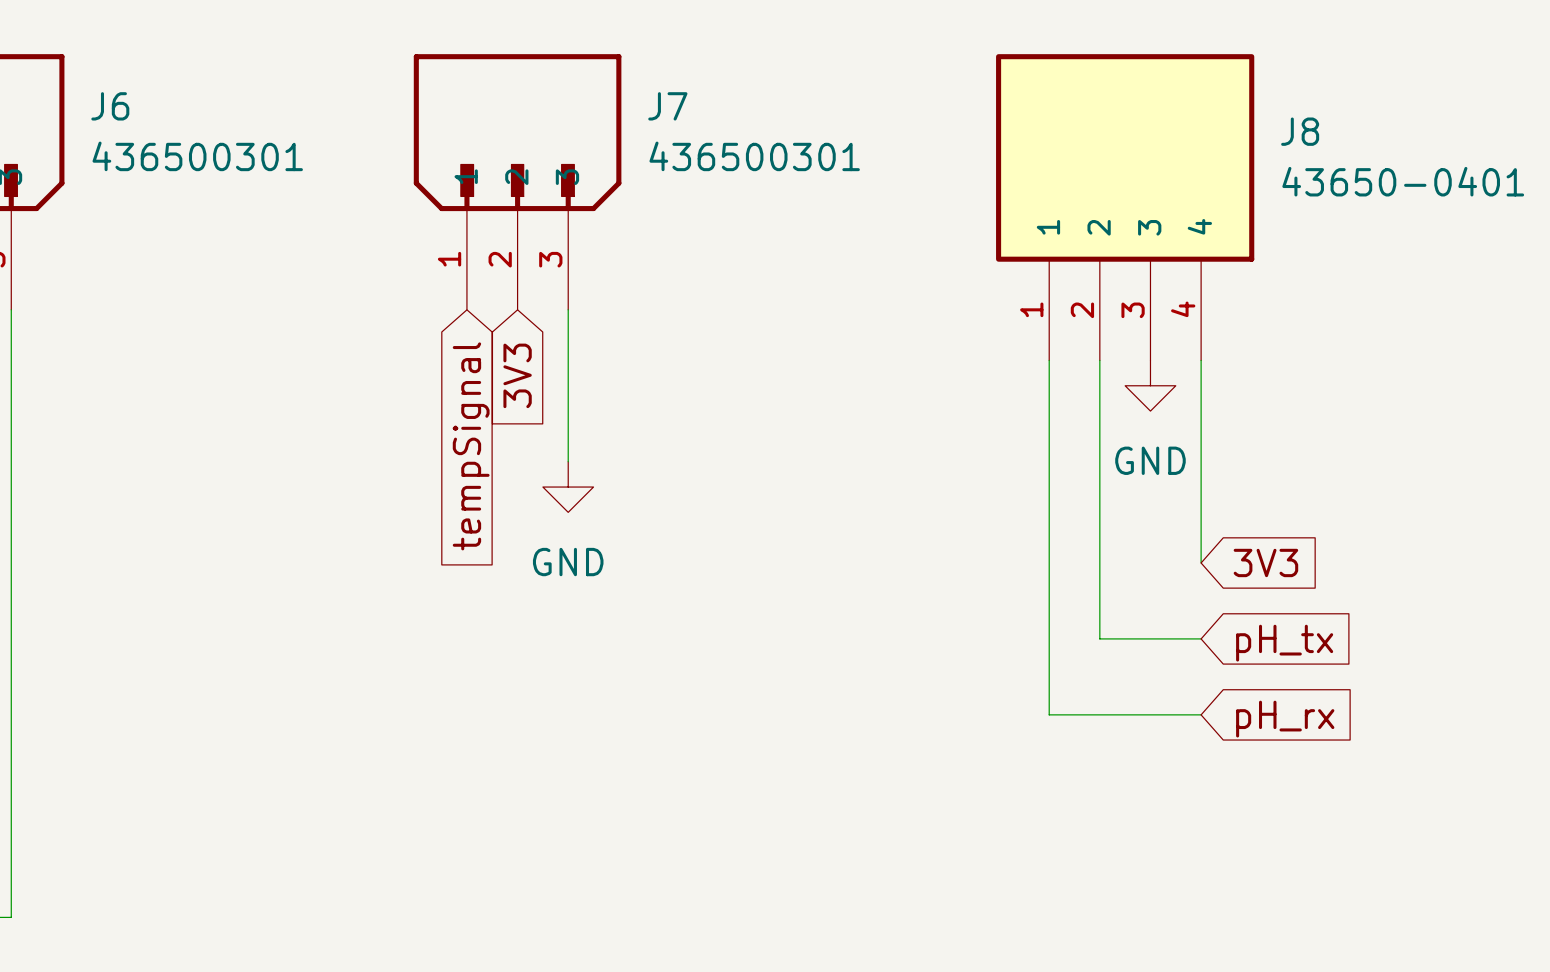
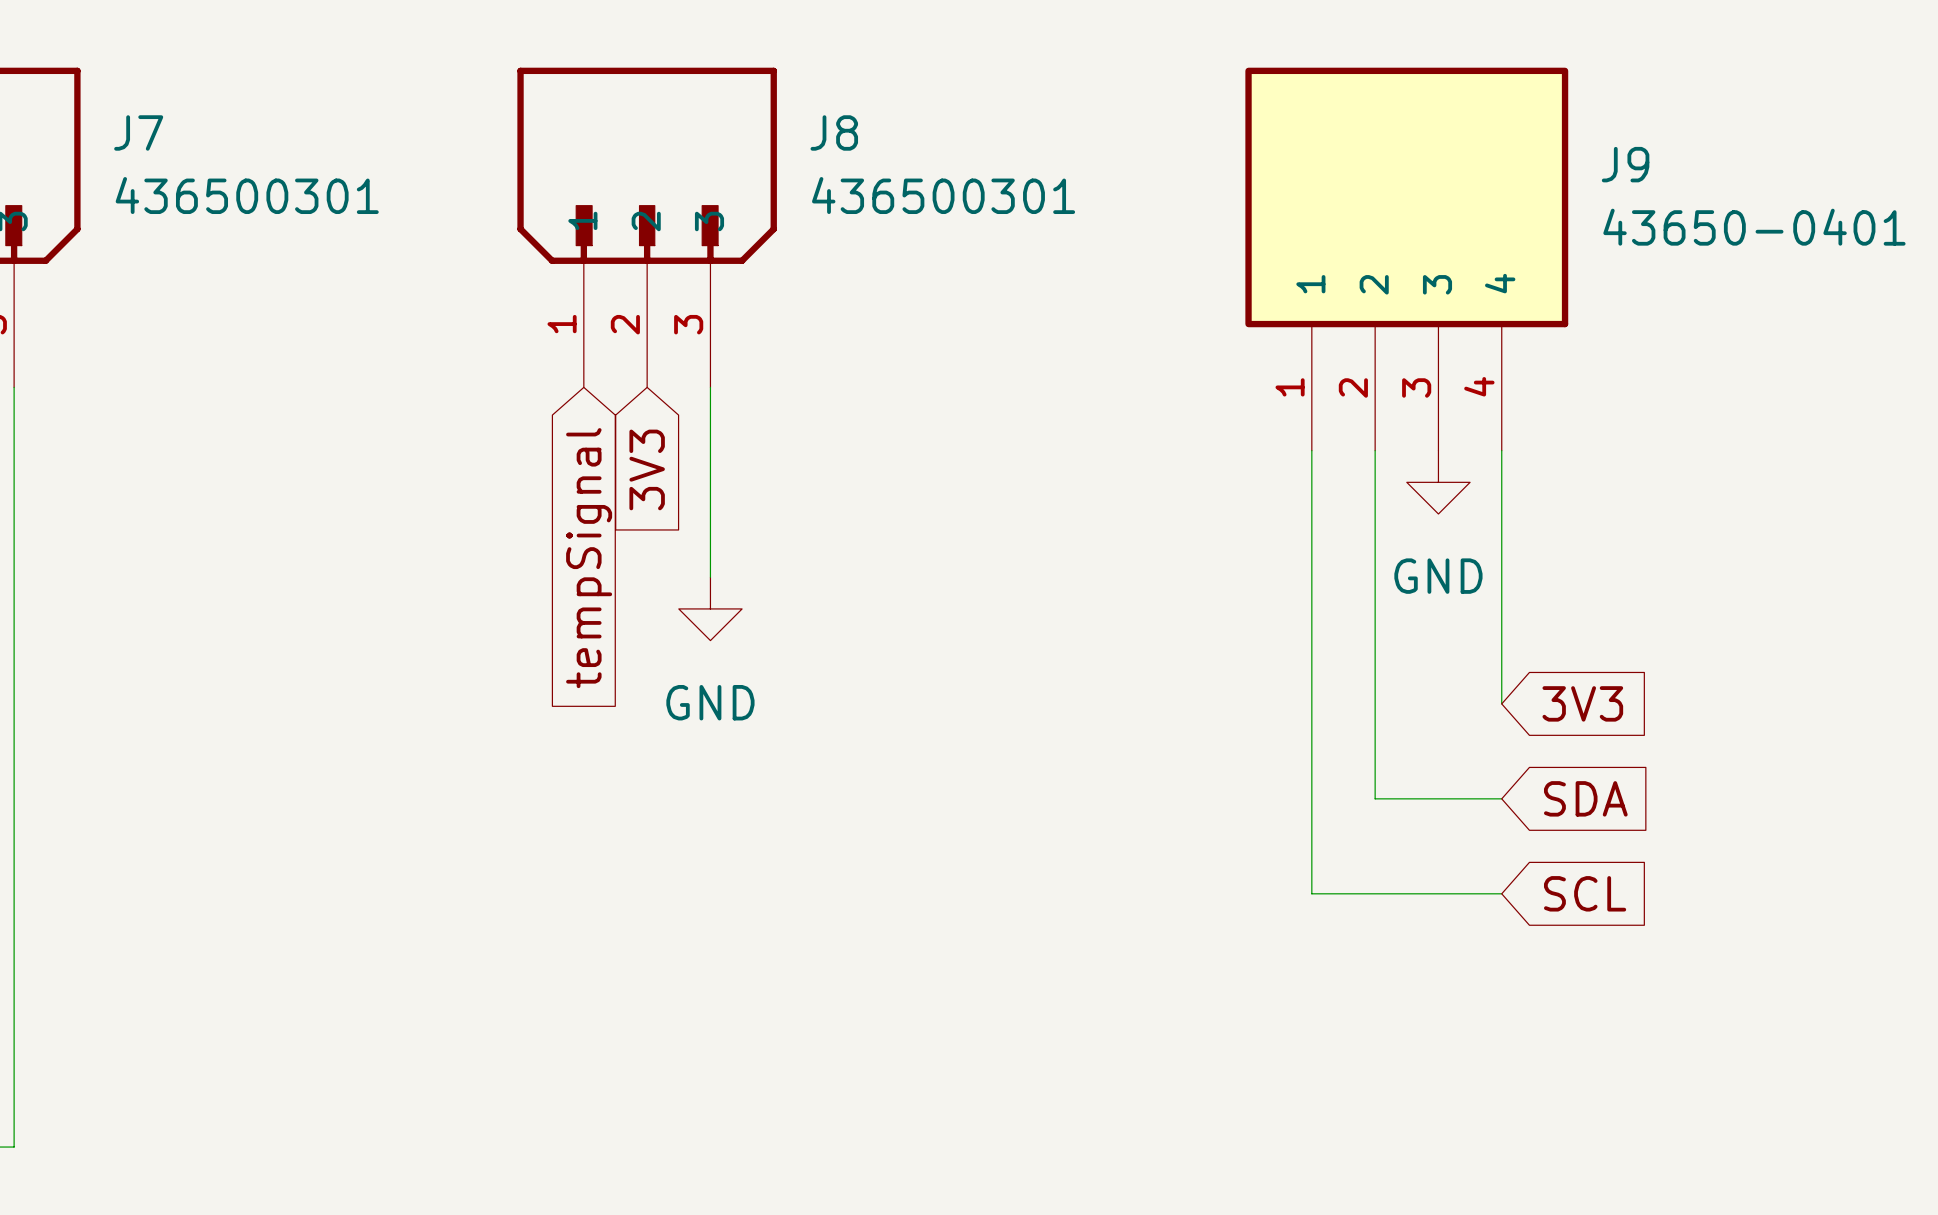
J6 name: J6 (110, 106) -> J7 (138, 132)
J7 name: J7 (667, 106) -> J8 (834, 132)
J8 name: J8 (1300, 131) -> J9 (1625, 164)
global label: pH_tx (1284, 643) -> SDA (1585, 798)
global label: pH_rx (1285, 719) -> SCL (1585, 893)

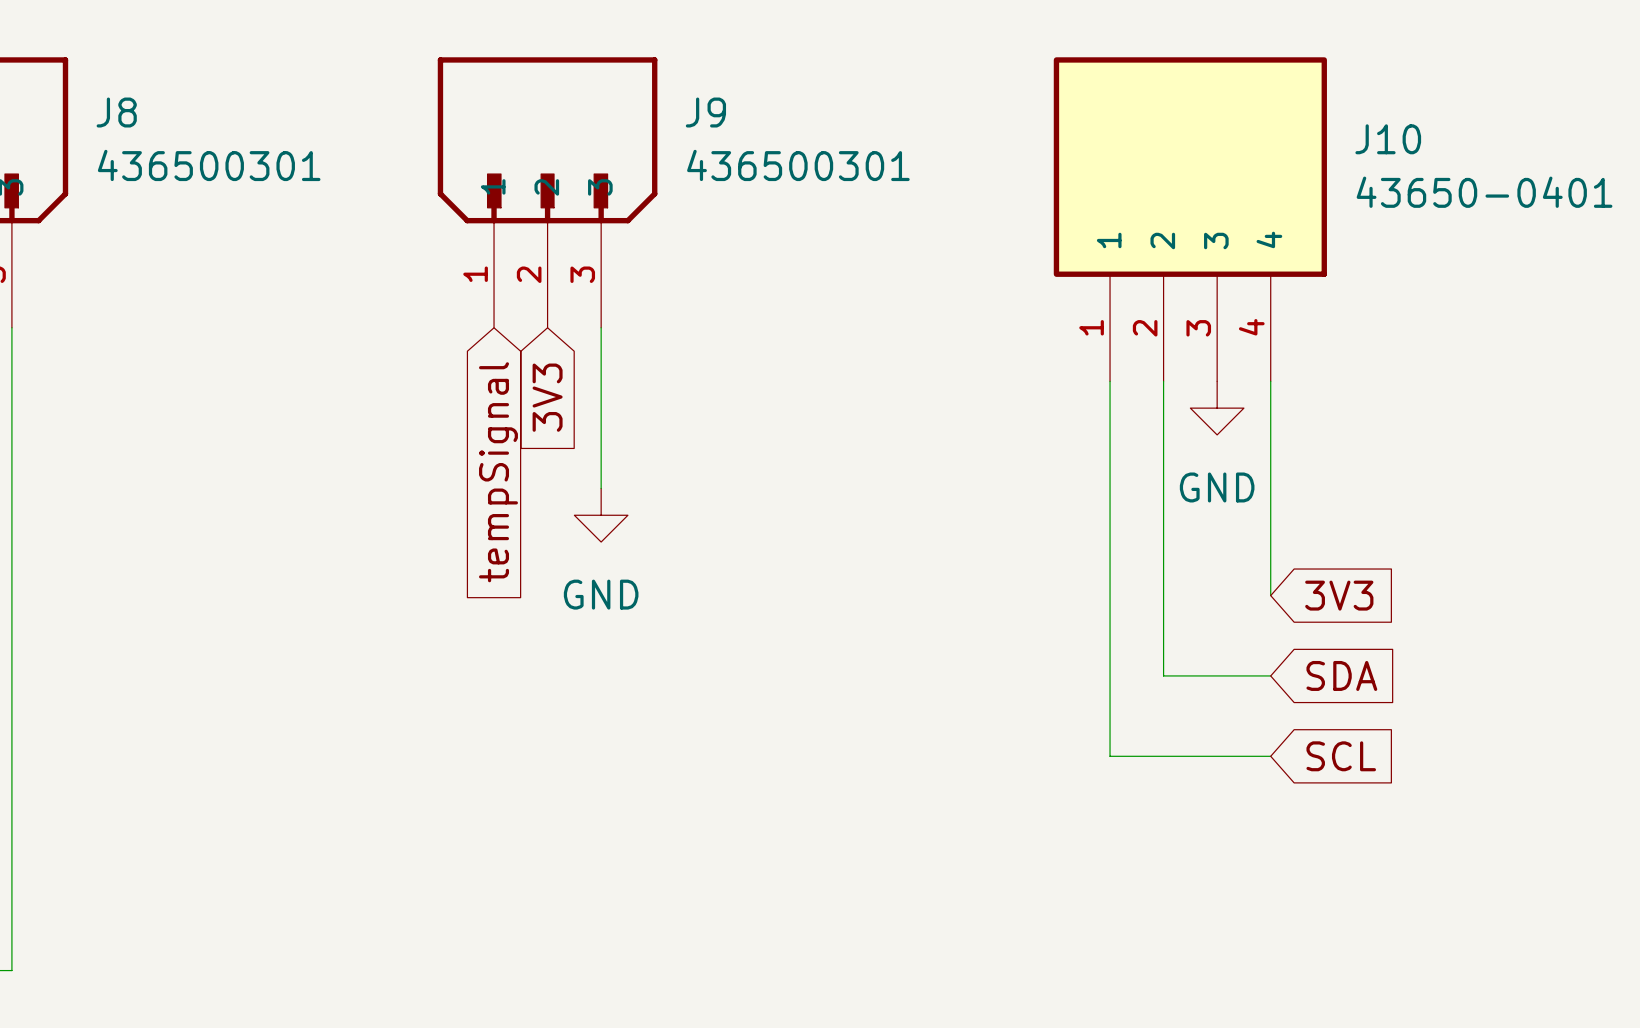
J7 name: J7 (138, 132) -> J8 (116, 112)
J8 name: J8 (834, 132) -> J9 (705, 112)
J9 name: J9 (1625, 164) -> J10 (1388, 139)

